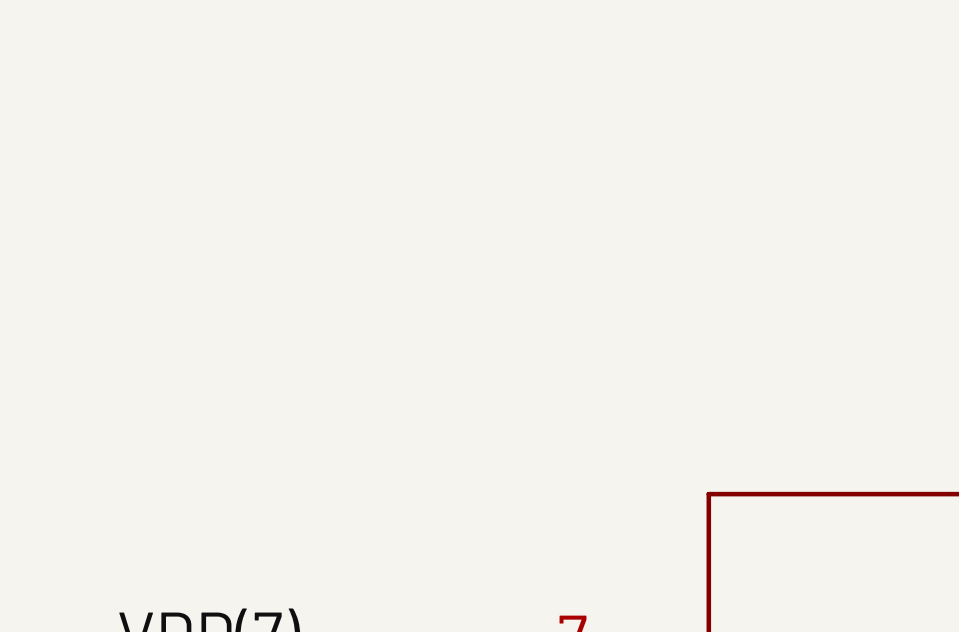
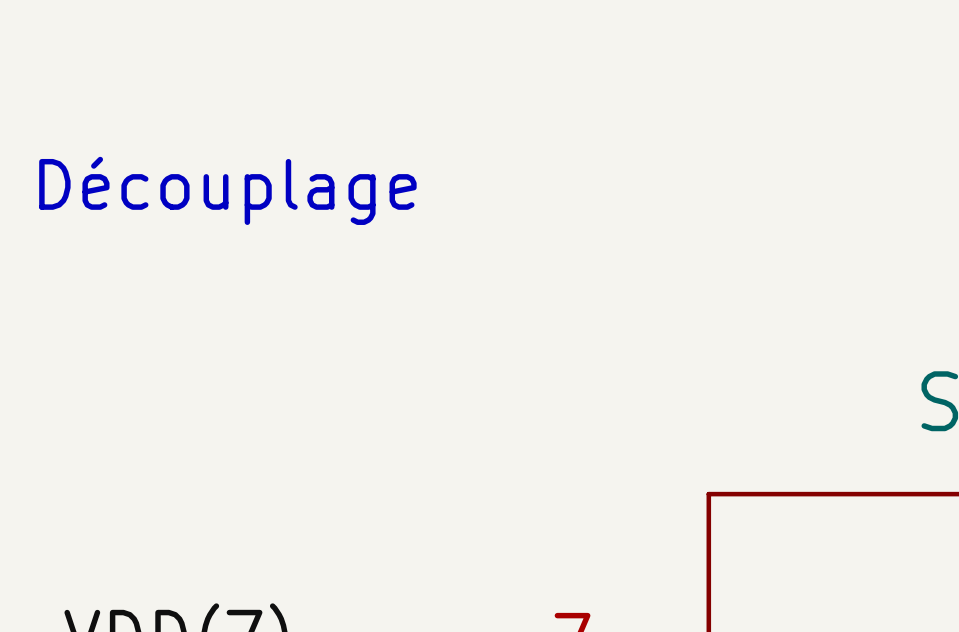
text: none -> Découplage (227, 190)

